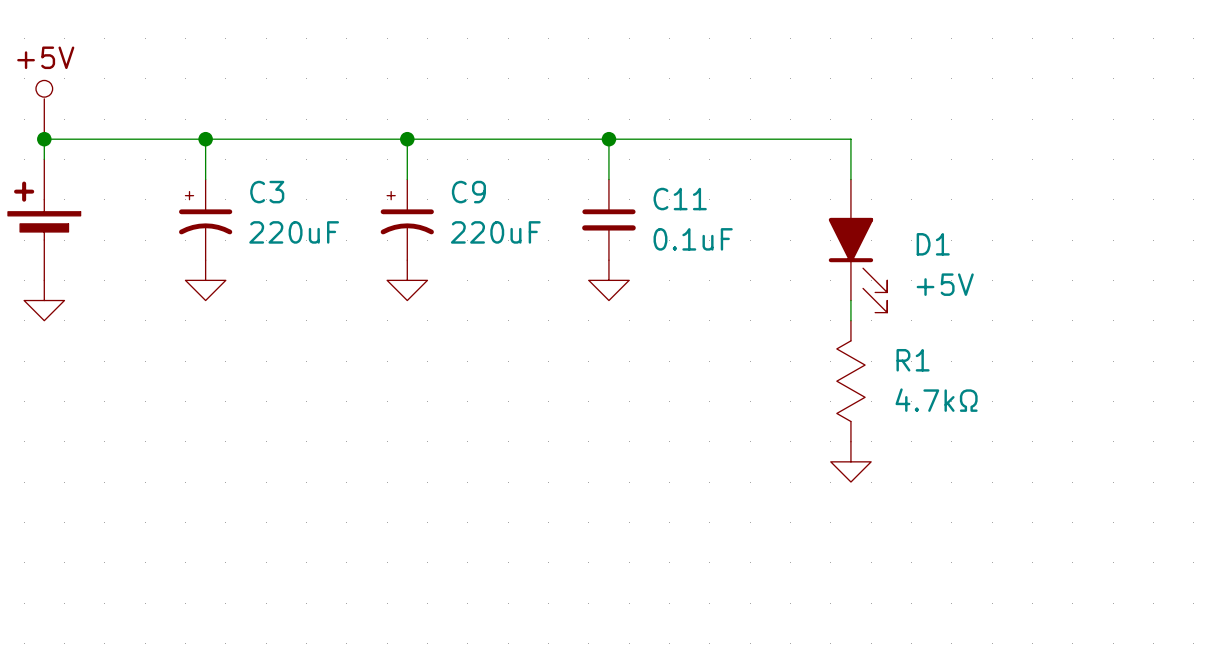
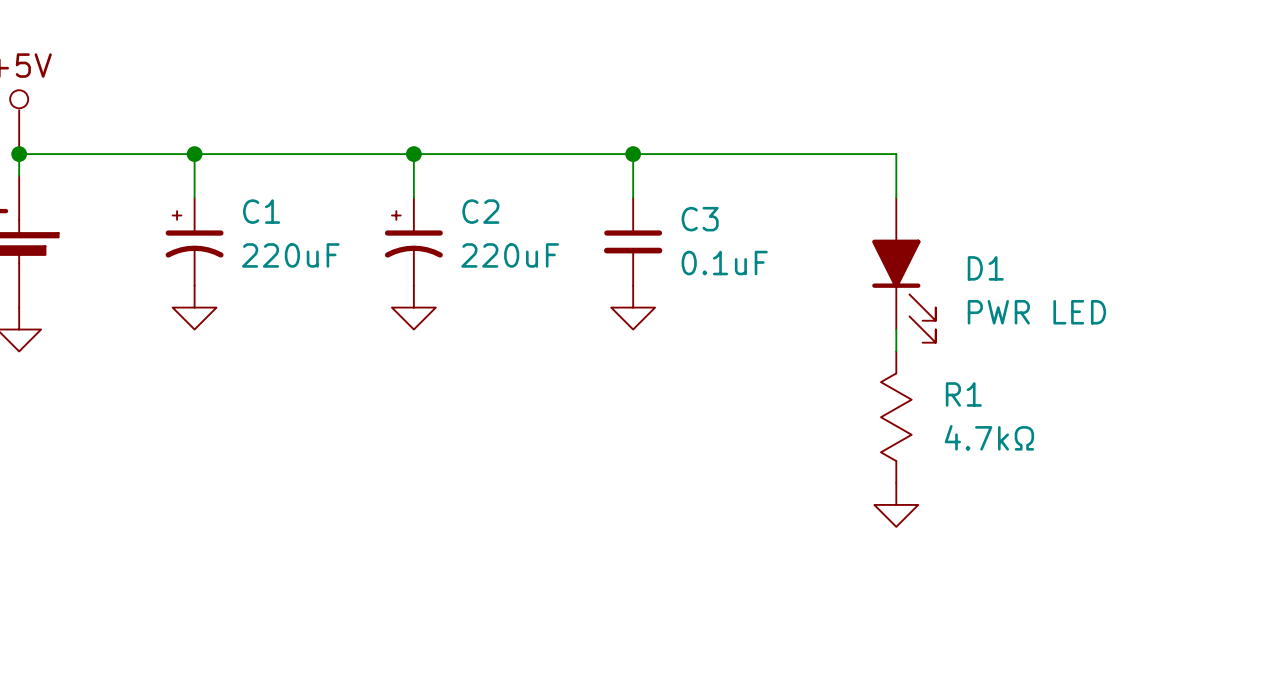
C3 name: C3 (267, 192) -> C1 (261, 211)
C9 name: C9 (468, 192) -> C2 (480, 211)
C11 name: C11 (680, 199) -> C3 (700, 219)
D1 value: +5V (945, 284) -> PWR LED (1036, 312)

